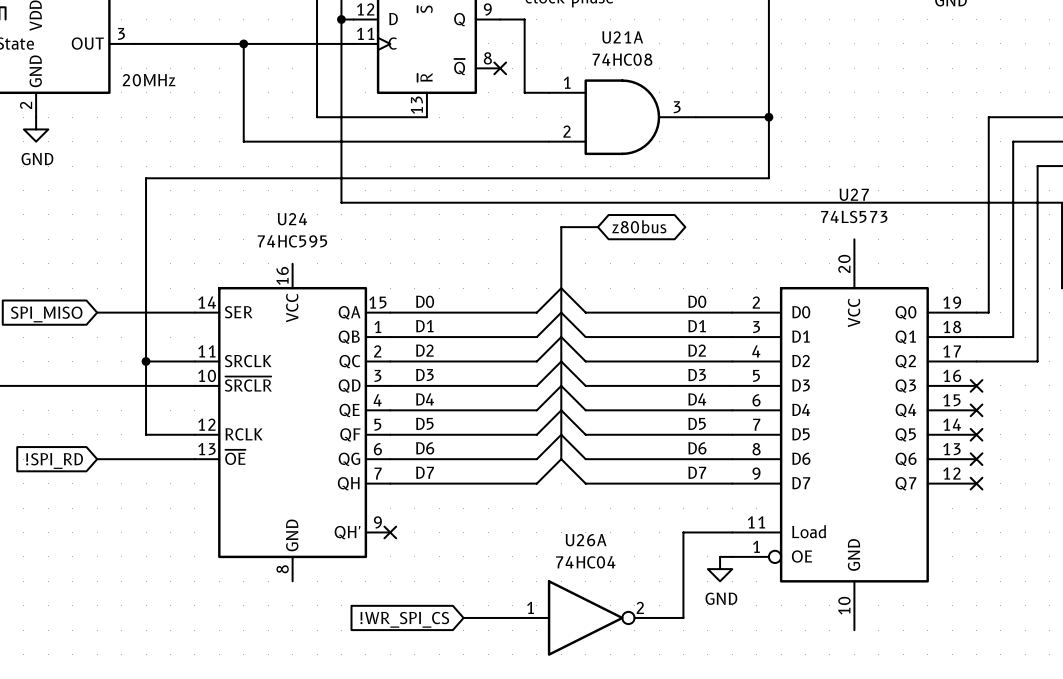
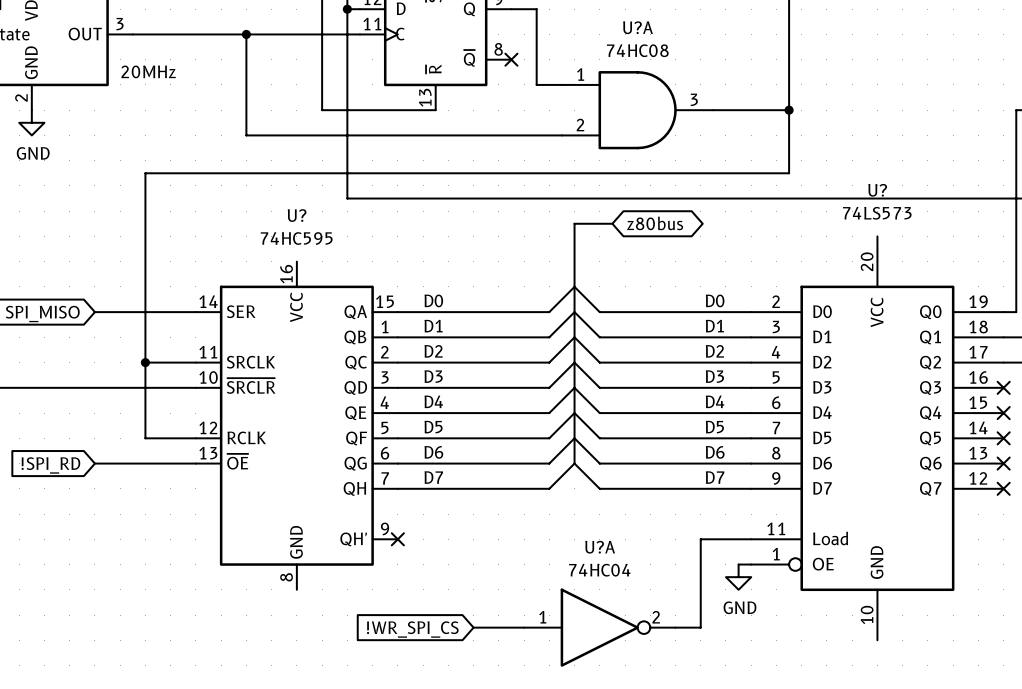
U21A name: U21A (622, 37) -> U?A (638, 27)
U27 name: U27 (854, 194) -> U? (877, 190)
U24 name: U24 (292, 219) -> U? (297, 215)
U26A name: U26A (586, 540) -> U?A (600, 547)

